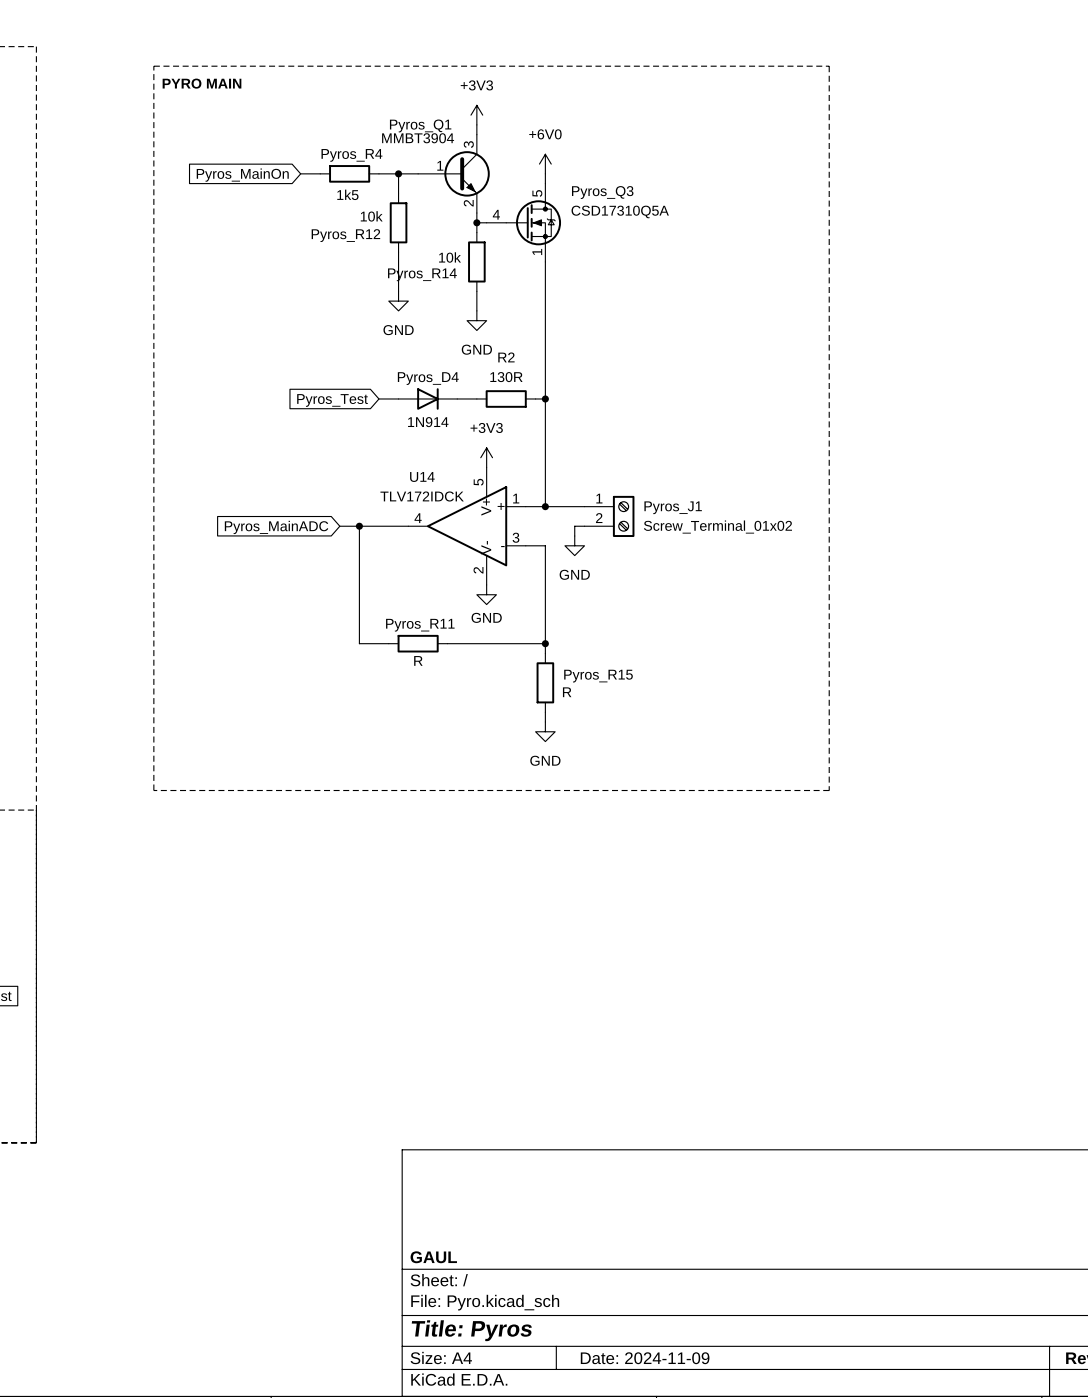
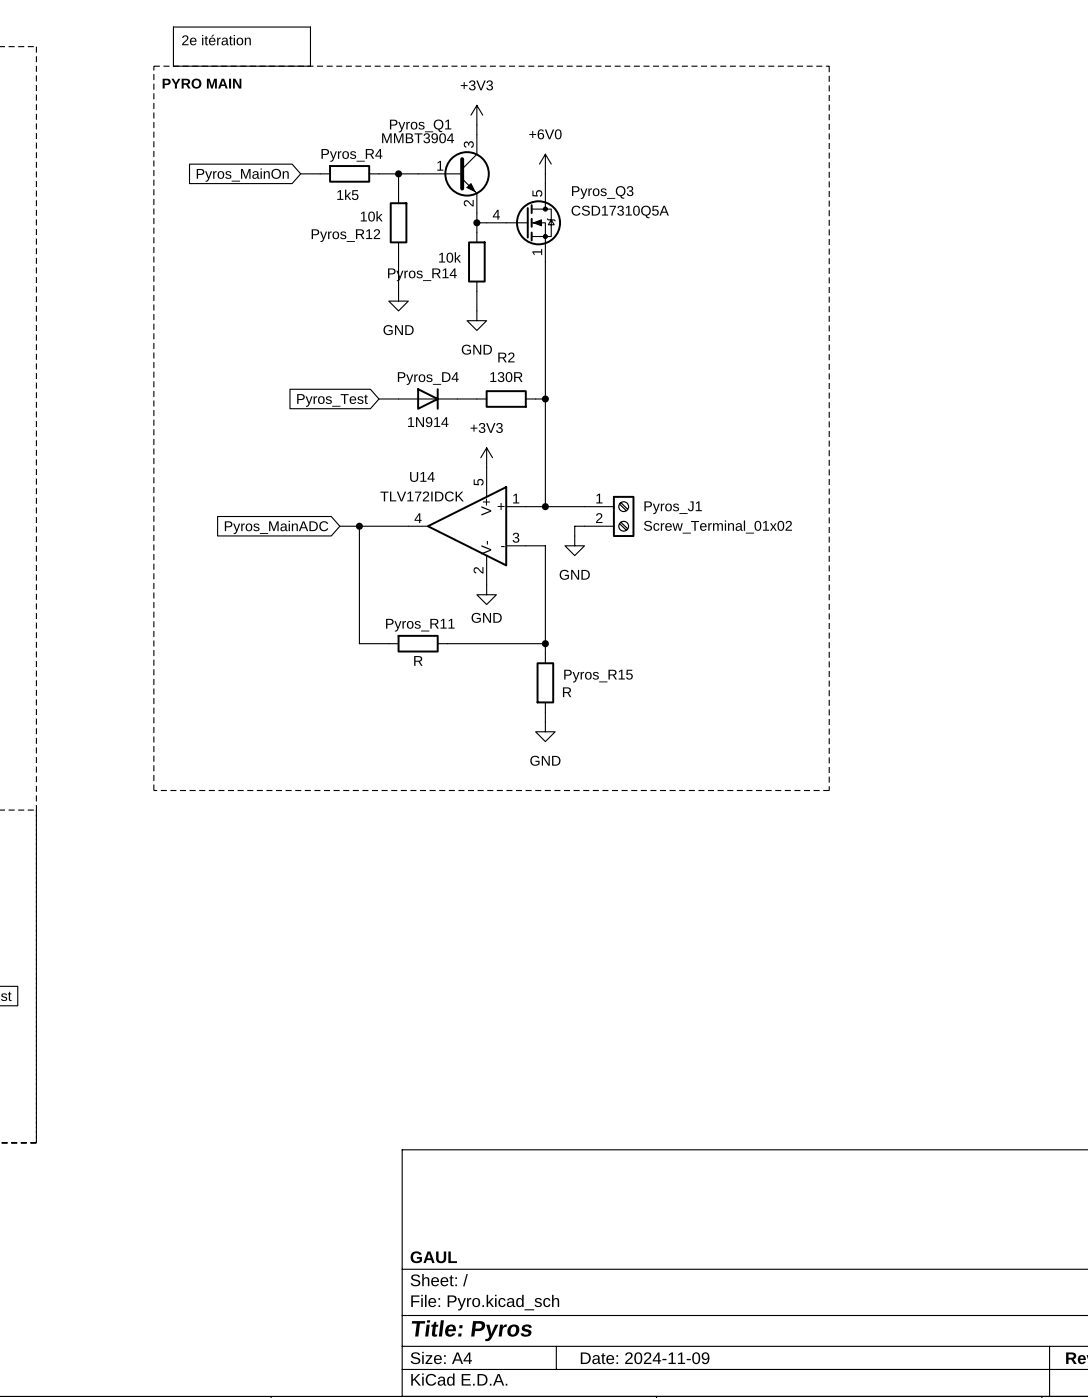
line: none -> (173, 27) (310, 27) (310, 66) (173, 66) (173, 27)
text: none -> 2e itération (216, 40)

